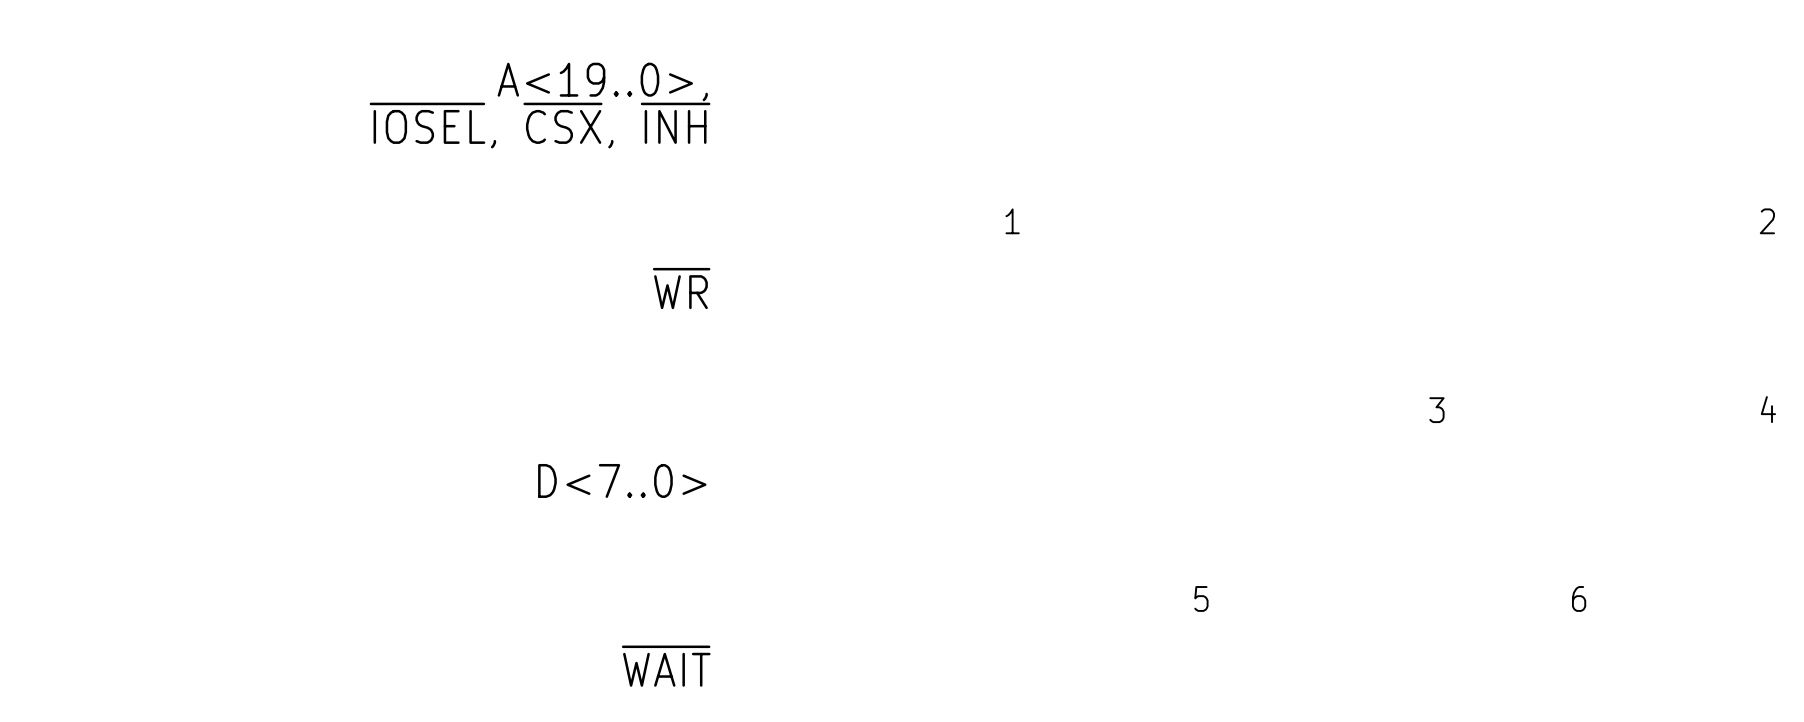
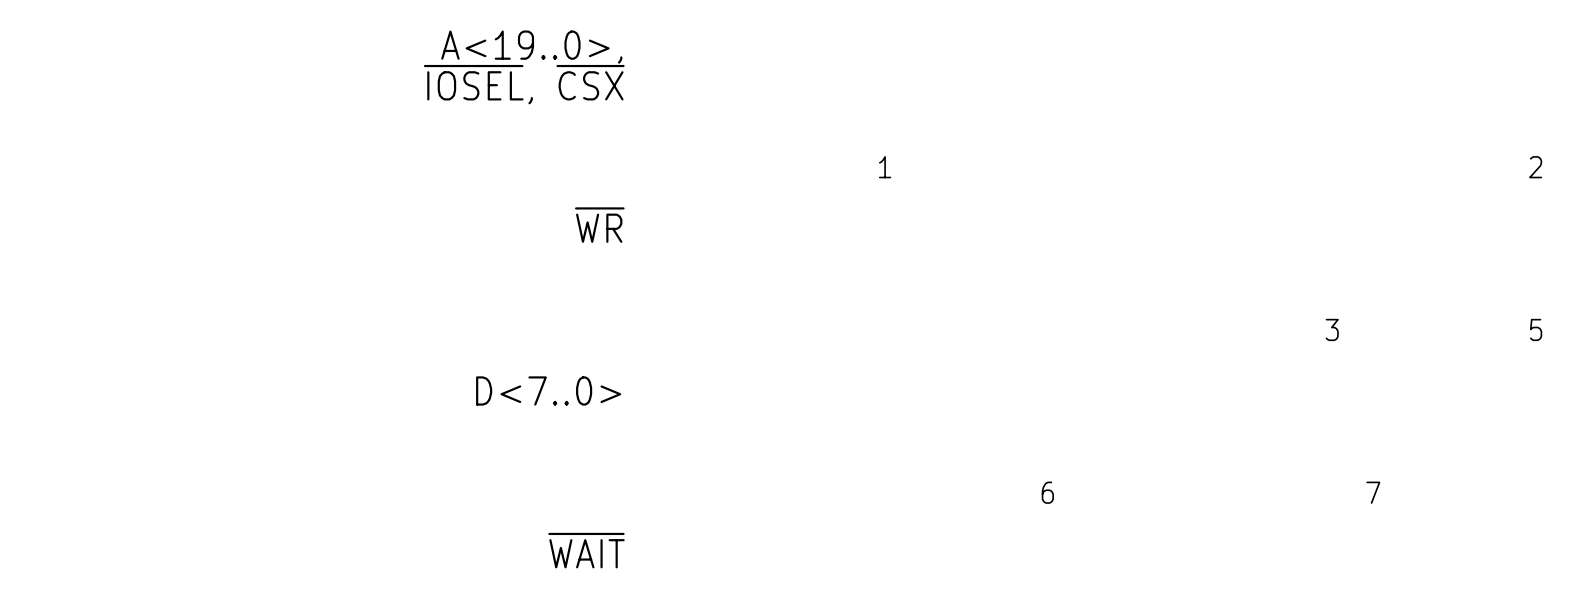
text: ~{IOSEL}, ~{CSX}, ~{INH} (540, 125) -> ~{IOSEL}, ~{CSX} (524, 84)
text: 4 (1768, 409) -> 5 (1536, 329)
text position: 3 (1436, 410) -> 3 (1332, 329)
text: 5 (1201, 598) -> 6 (1047, 492)
text: 6 (1579, 598) -> 7 (1373, 492)

